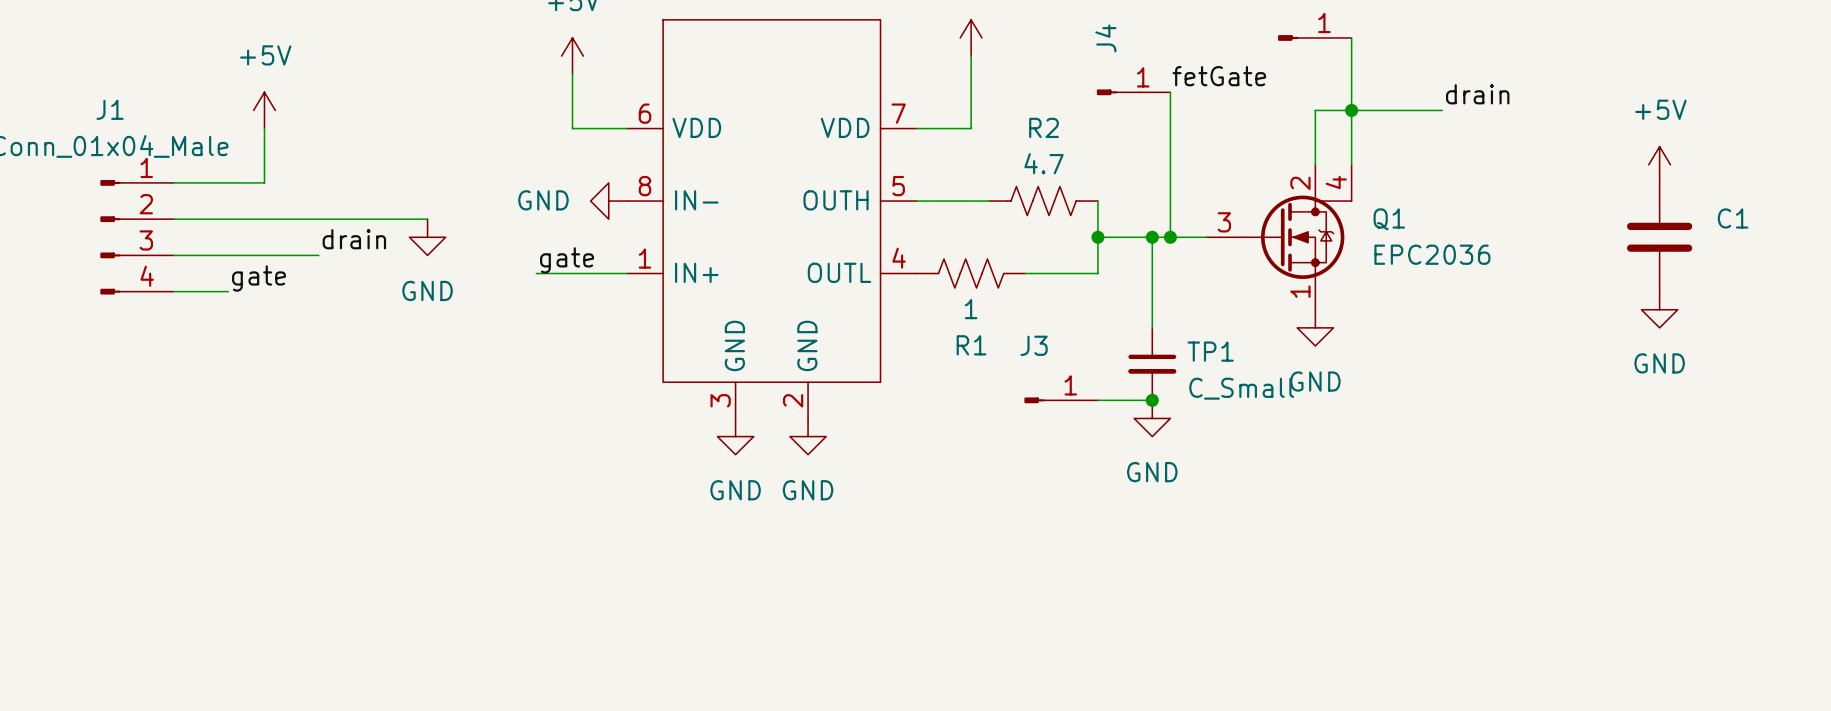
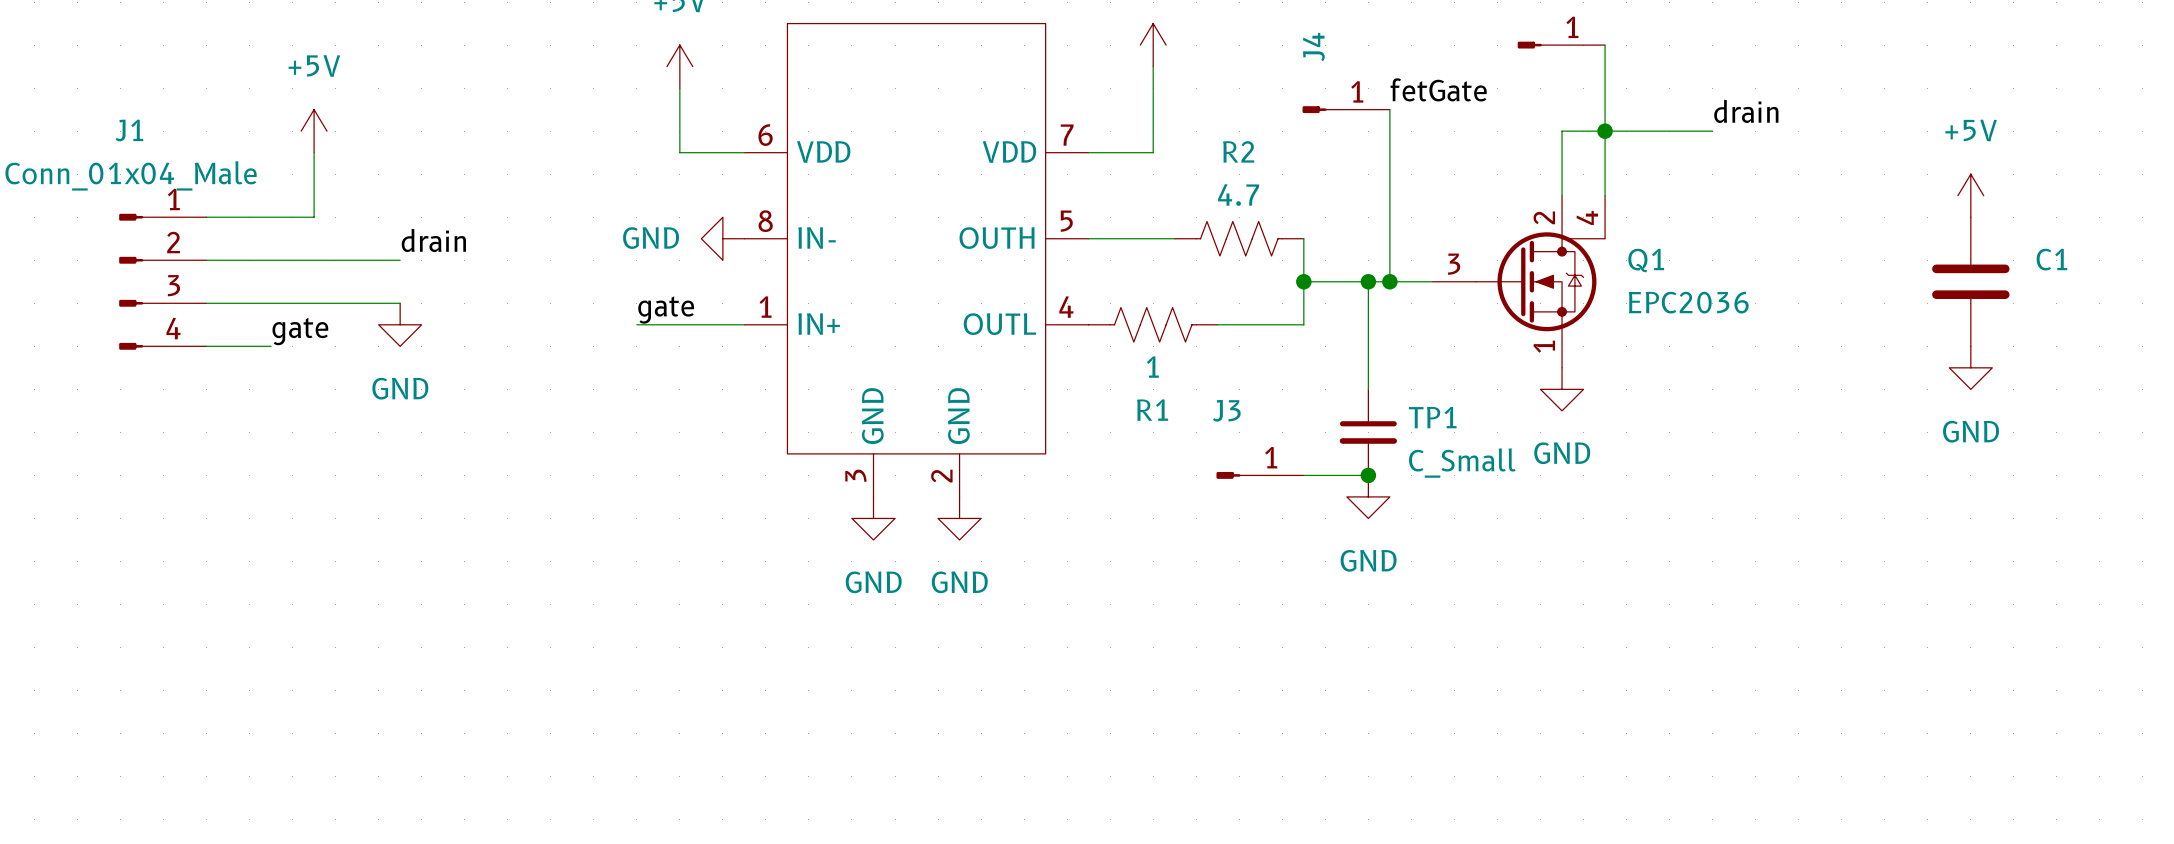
wire: (336, 219) (427, 219) -> none
power symbol position: GND (427, 237) -> GND (400, 324)
label position: drain (354, 239) -> drain (433, 240)
wire: none -> (378, 303) (400, 303)

